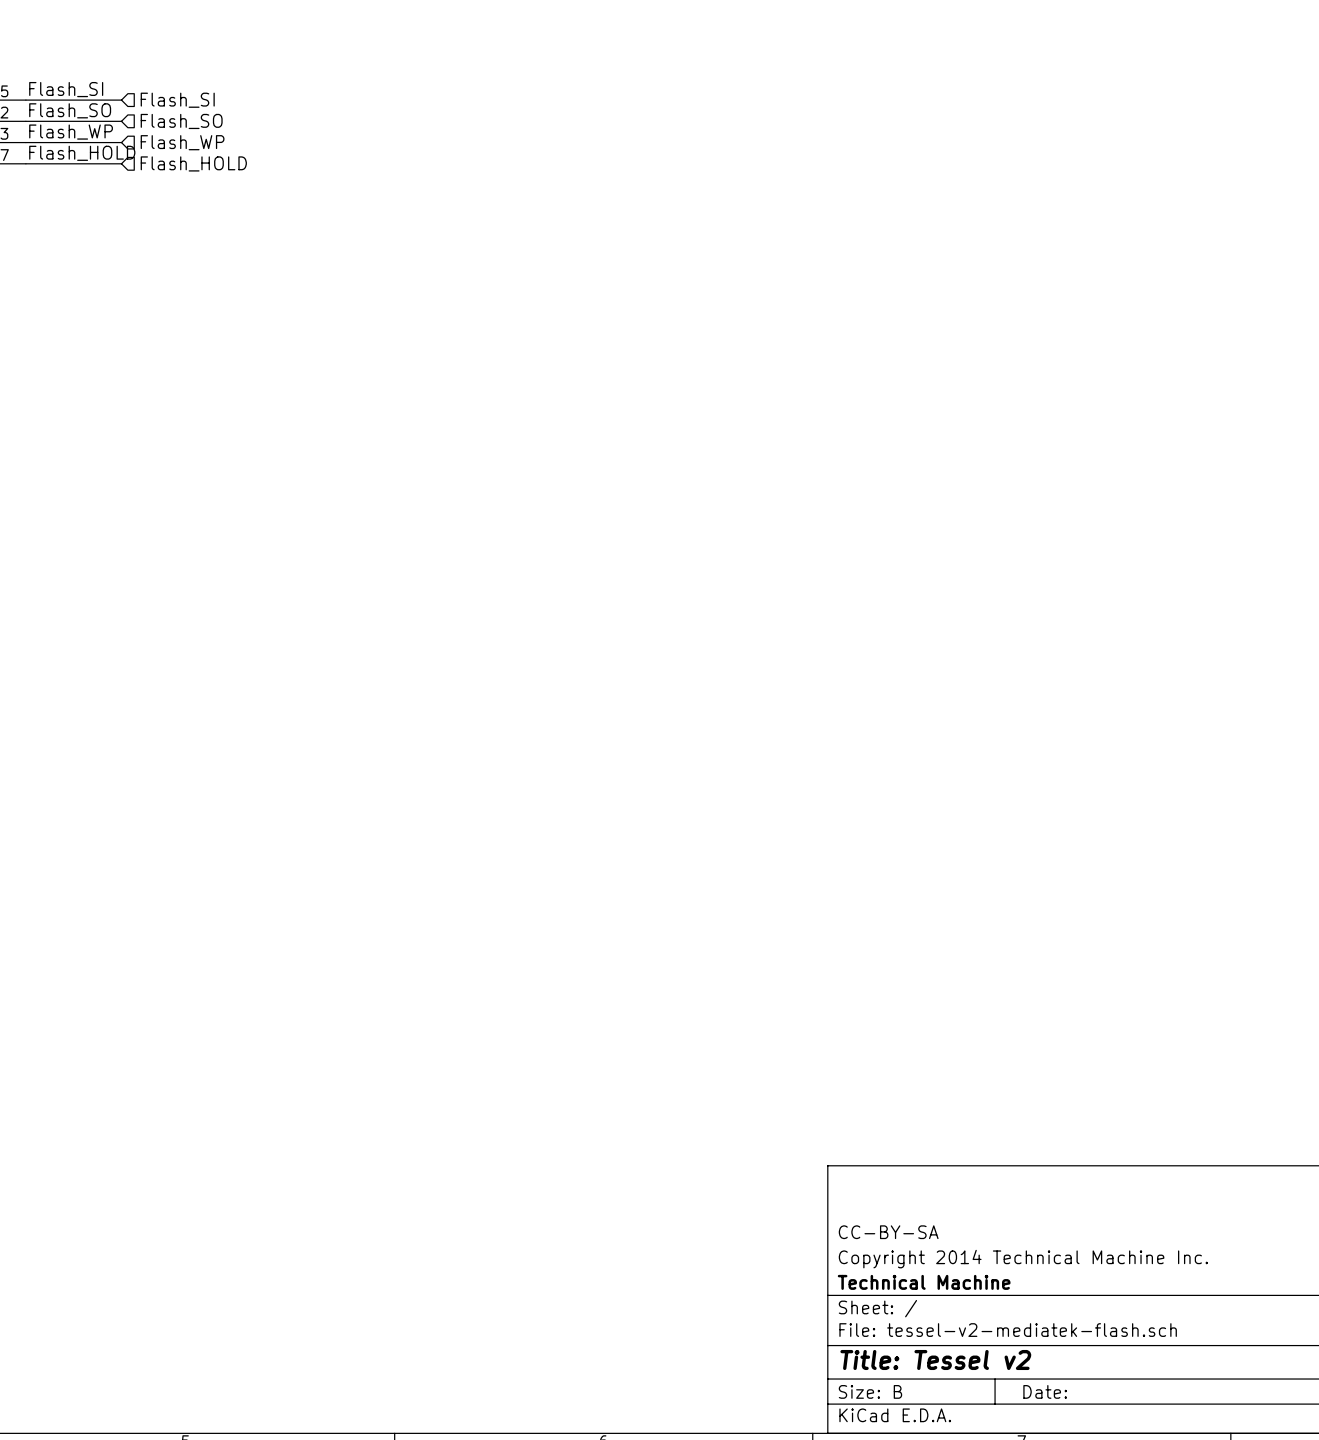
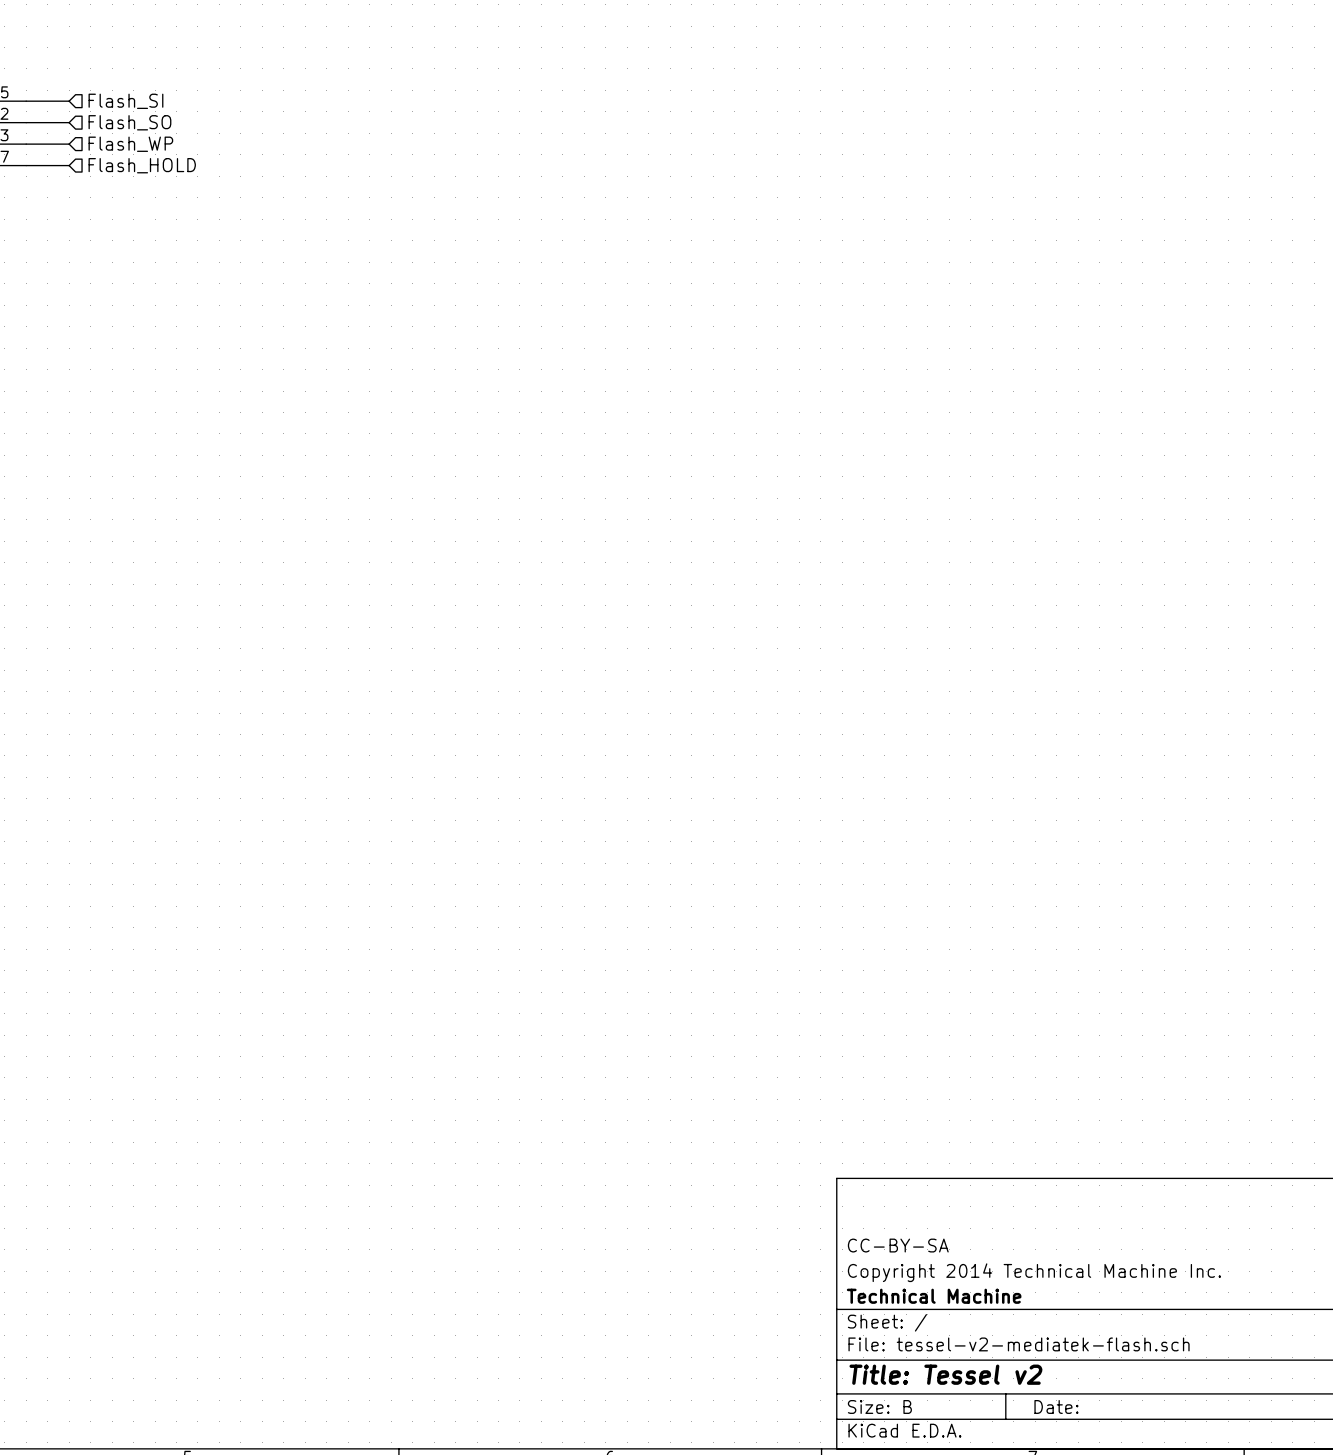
label: Flash_SI (66, 89) -> none
wire: (68, 100) (121, 100) -> none
hierarchical label position: Flash_SI (177, 100) -> Flash_SI (125, 101)
label: Flash_SO (70, 110) -> none
wire: (68, 121) (121, 121) -> none
hierarchical label position: Flash_SO (181, 121) -> Flash_SO (129, 122)
label: Flash_WP (71, 132) -> none
wire: (68, 142) (121, 142) -> none
hierarchical label position: Flash_WP (182, 142) -> Flash_WP (130, 144)
label: Flash_HOLD (82, 153) -> none
wire: (68, 163) (121, 163) -> none
hierarchical label position: Flash_HOLD (193, 163) -> Flash_HOLD (142, 165)

